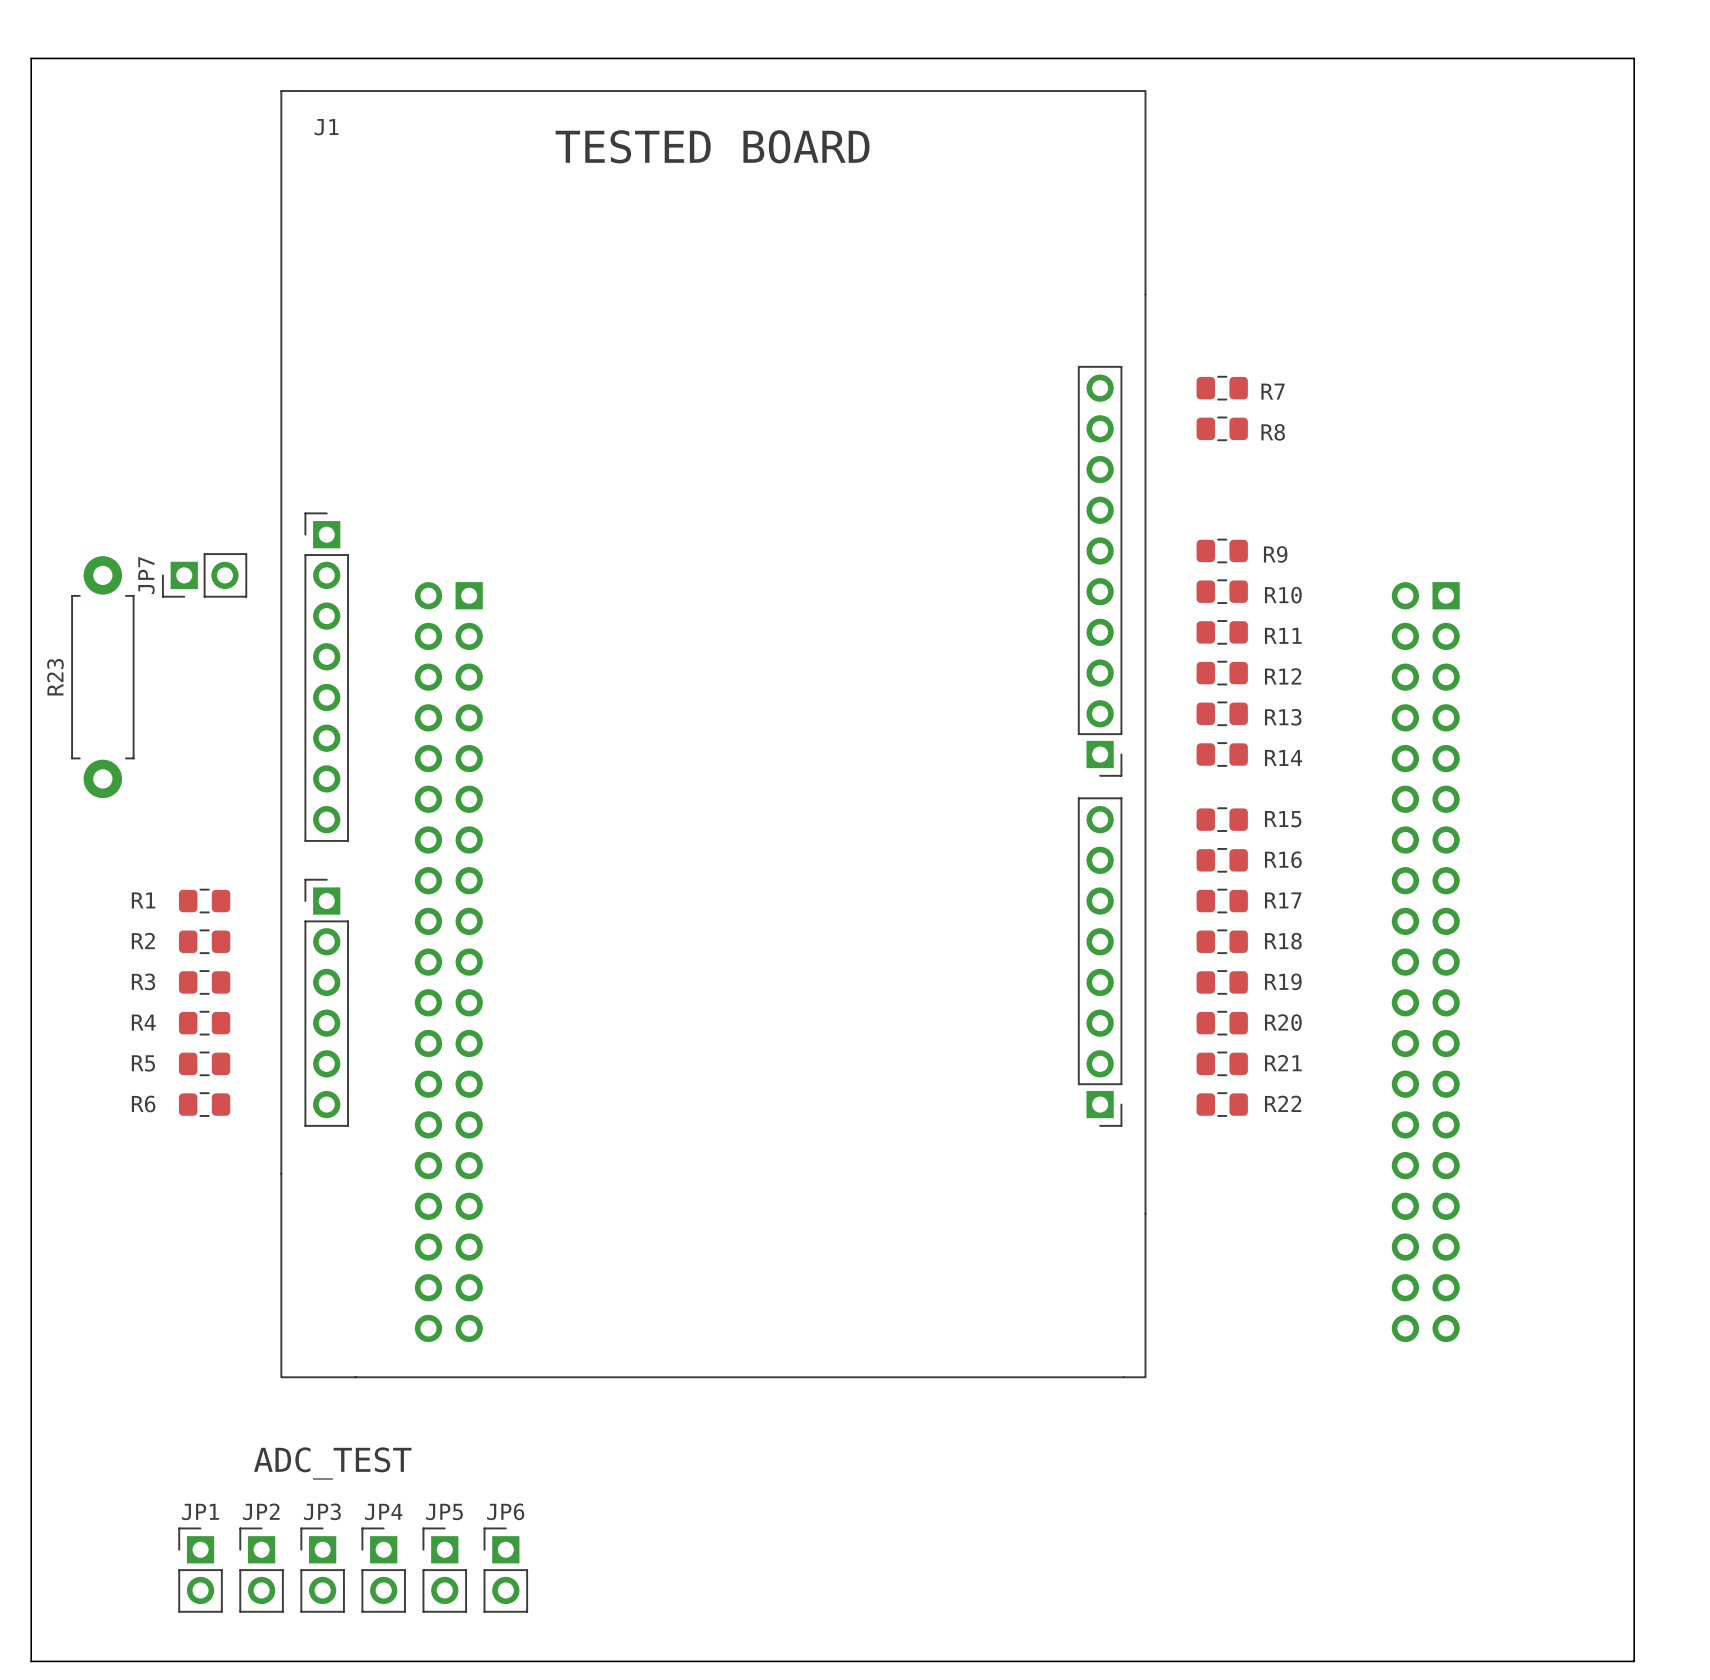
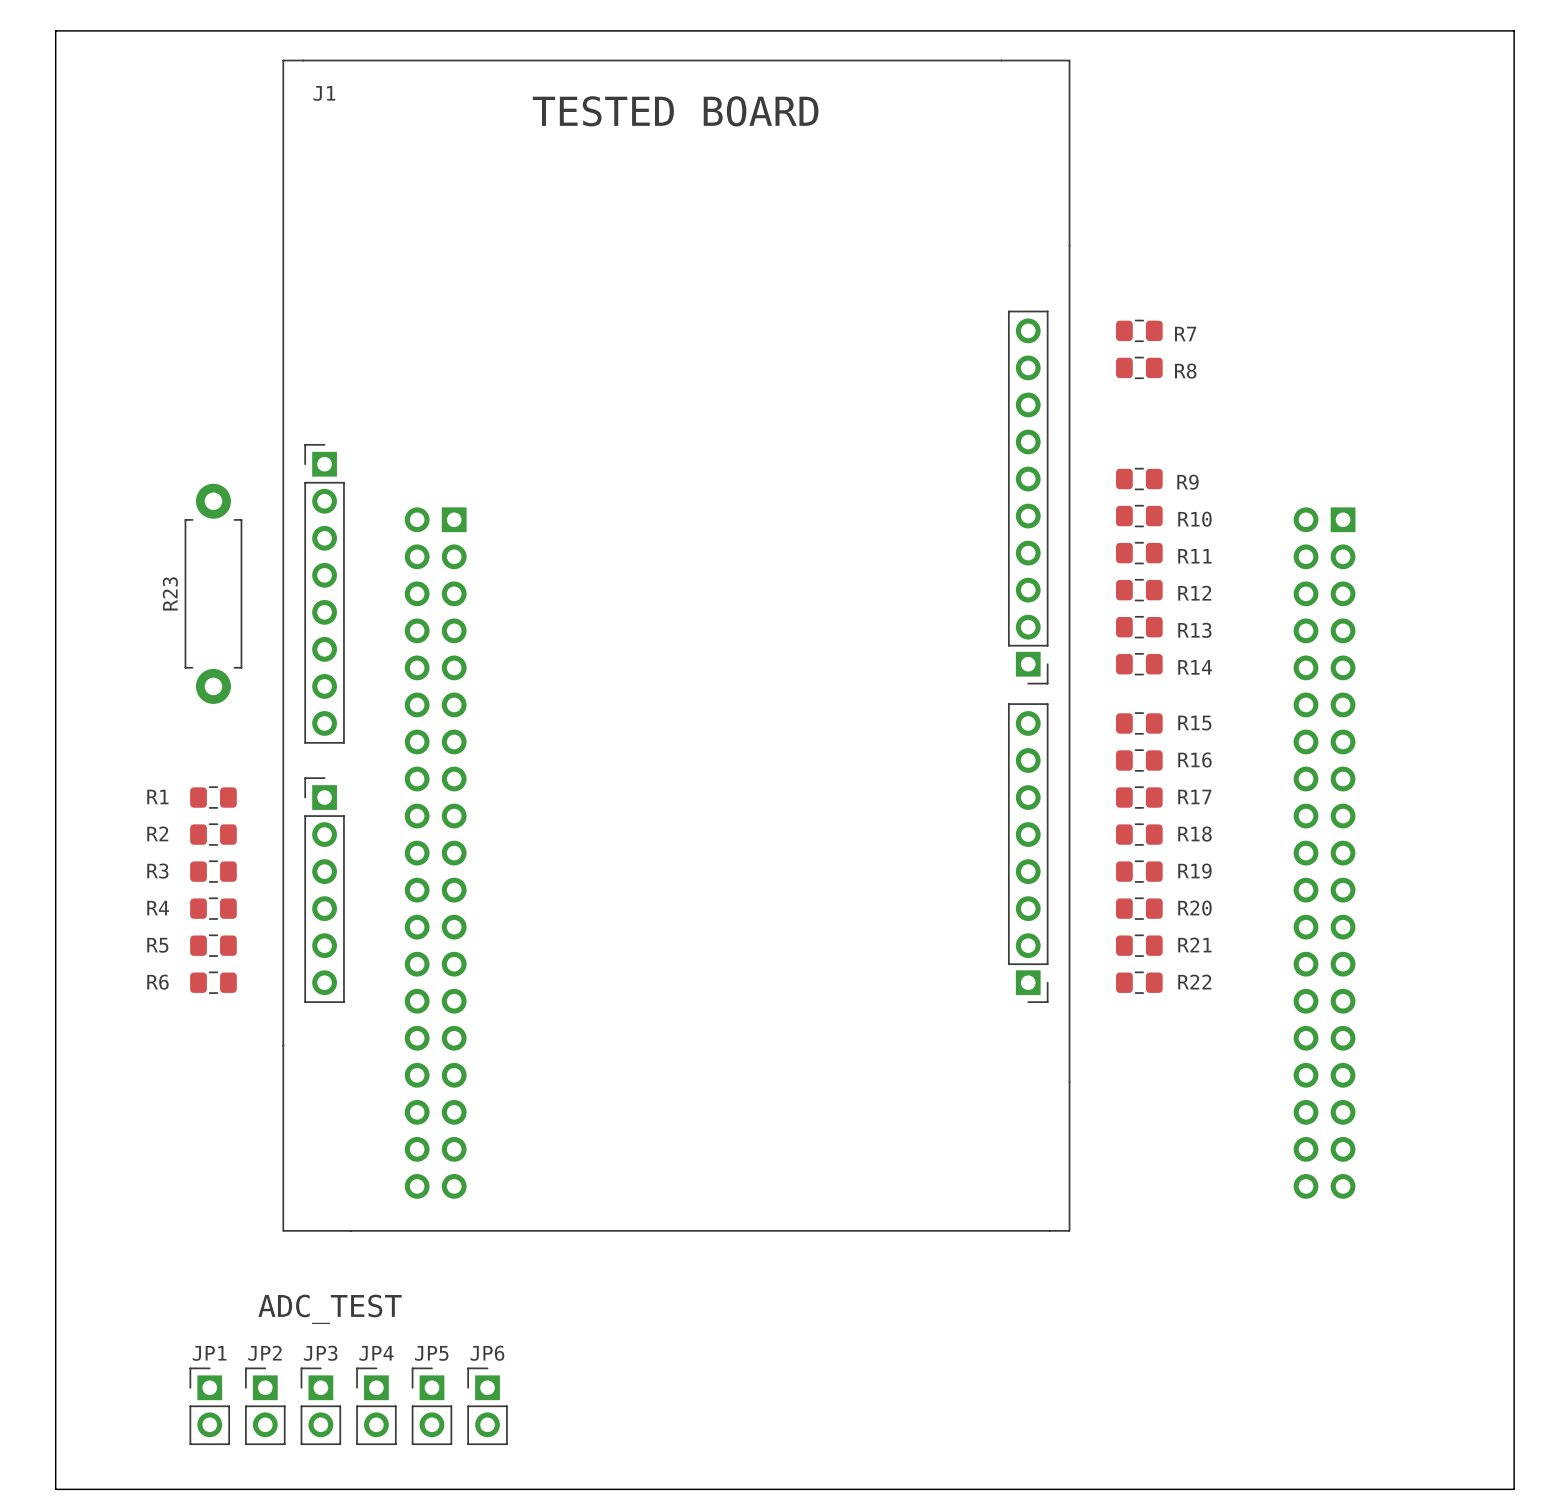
JP7: (204, 575) -> none
R23 position: (102, 677) -> (213, 593)

